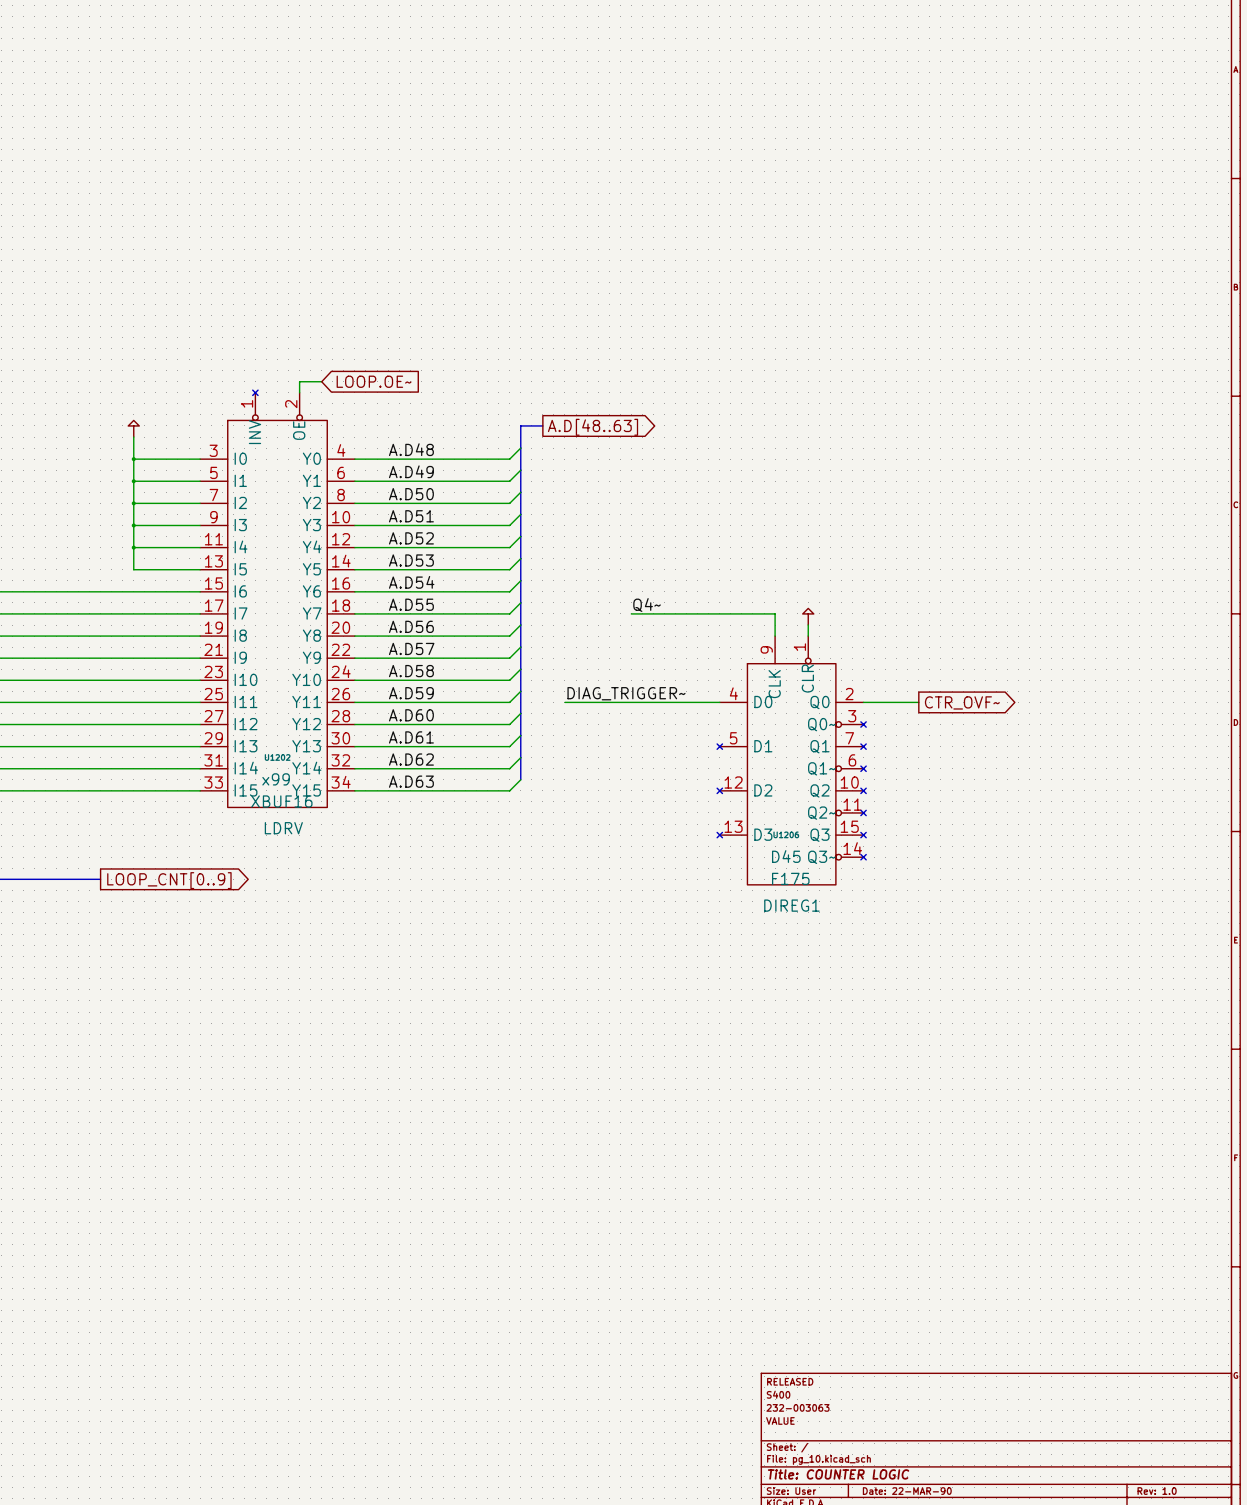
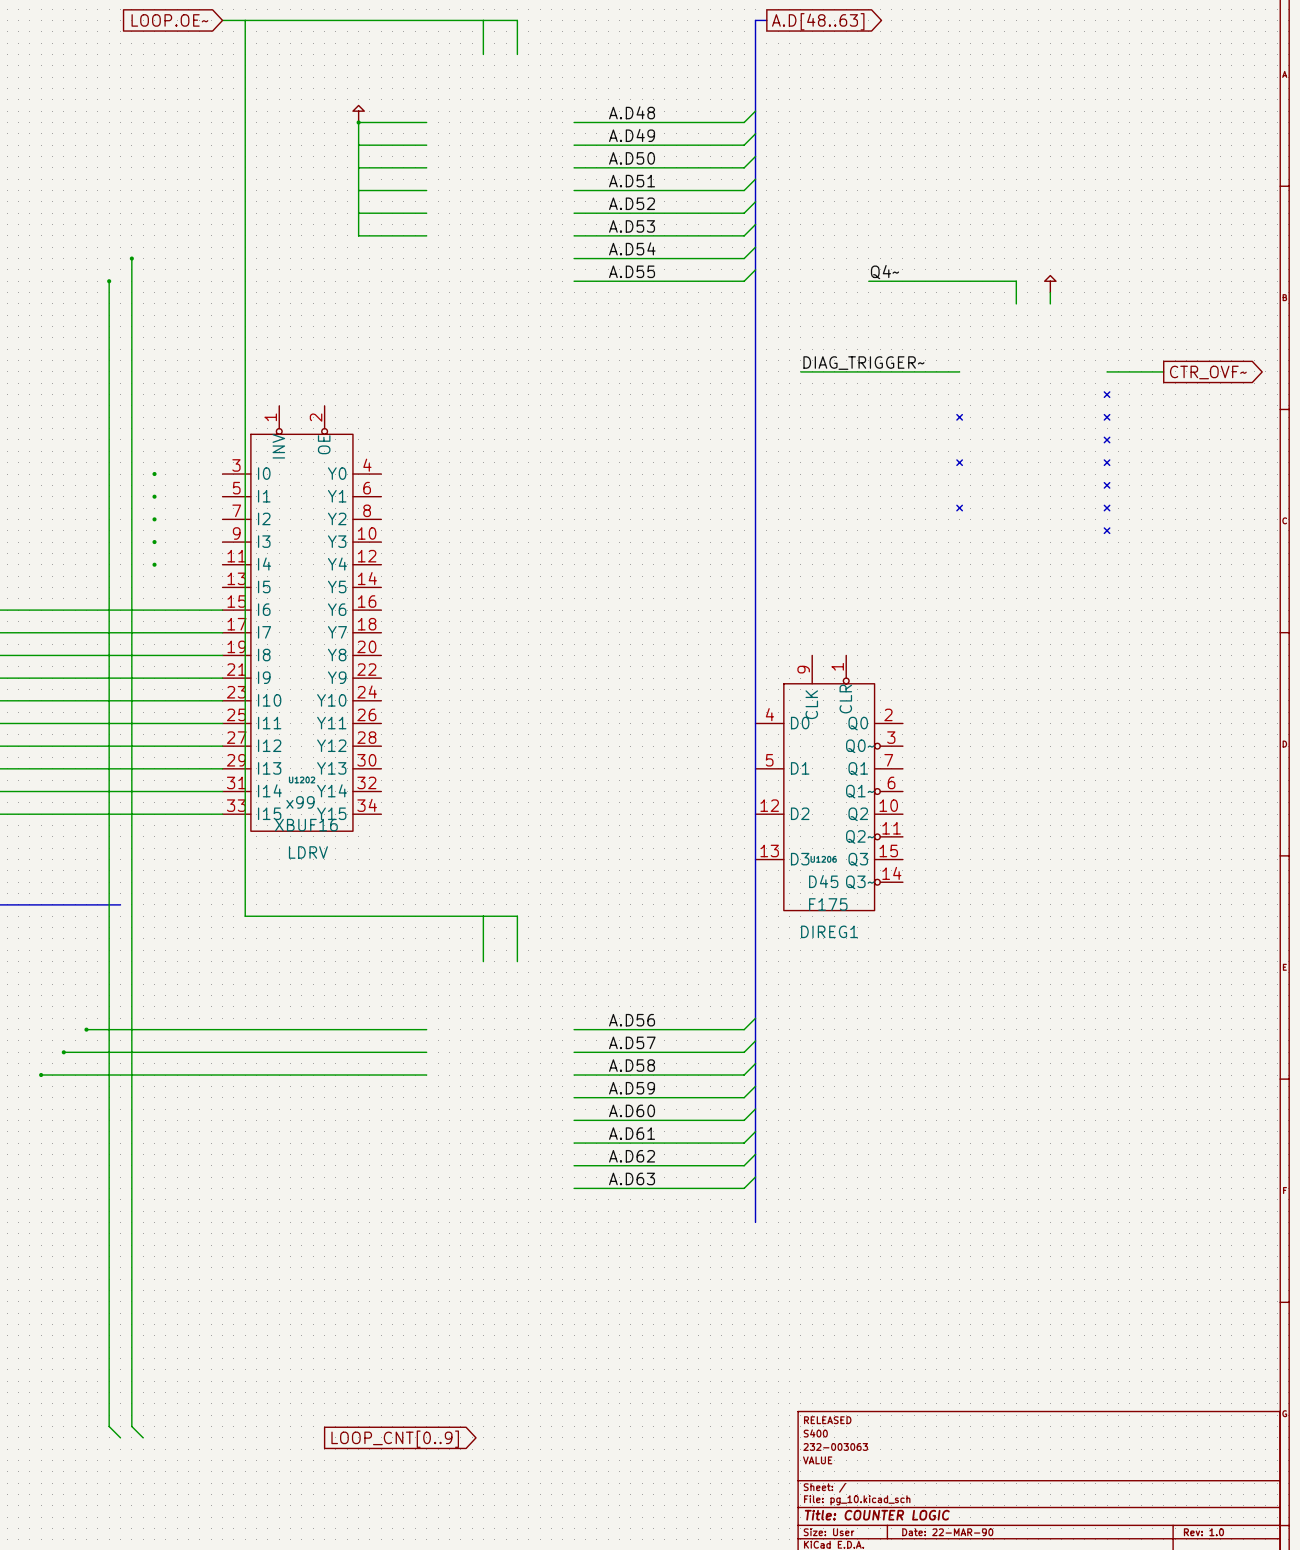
global label: none -> LOOP.OE~ (169, 20)
wire: none -> (222, 20) (517, 20) (517, 54)
wire: none -> (245, 20) (245, 916) (517, 916) (517, 961)
wire: none -> (483, 20) (483, 54)
bus: none -> (766, 20) (755, 20) (755, 1222)
global label: none -> A.D[48..63] (818, 21)
wire: none -> (755, 111) (744, 122) (574, 122)
label: none -> A.D48 (632, 112)
power symbol: none -> (358, 113)
junction: none -> (358, 122)
wire: none -> (426, 122) (358, 122) (358, 235) (426, 235)
wire: none -> (755, 133) (744, 145) (574, 145)
label: none -> A.D49 (632, 135)
wire: none -> (358, 145) (426, 145)
wire: none -> (755, 156) (744, 167) (574, 167)
label: none -> A.D50 (632, 158)
wire: none -> (358, 167) (426, 167)
wire: none -> (755, 179) (744, 190) (574, 190)
label: none -> A.D51 (632, 181)
wire: none -> (358, 190) (426, 190)
wire: none -> (755, 201) (744, 213) (574, 213)
label: none -> A.D52 (632, 203)
wire: none -> (358, 213) (426, 213)
wire: none -> (755, 224) (744, 235) (574, 235)
label: none -> A.D53 (632, 226)
wire: none -> (755, 247) (744, 258) (574, 258)
label: none -> A.D54 (632, 248)
wire: none -> (131, 258) (131, 1426) (143, 1437)
junction: none -> (131, 258)
wire: none -> (755, 269) (744, 281) (574, 281)
label: none -> A.D55 (632, 271)
label: none -> Q4~ (885, 272)
wire: none -> (109, 281) (109, 1426) (120, 1437)
junction: none -> (109, 281)
wire: none -> (868, 281) (1016, 281) (1016, 303)
power symbol: none -> (1050, 283)
wire: none -> (1050, 292) (1050, 303)
label: none -> DIAG_TRIGGER~ (863, 363)
wire: none -> (800, 371) (959, 371)
wire: none -> (1107, 371) (1163, 371)
global label: none -> CTR_OVF~ (1208, 372)
wire: (321, 381) (299, 381) (299, 392) -> none
global label: LOOP.OE~ (374, 381) -> none
no-connect mark: none -> (1107, 394)
no-connect mark: (255, 392) -> none
no-connect mark: none -> (959, 417)
no-connect mark: none -> (1107, 417)
bus: (542, 425) (520, 425) (520, 779) -> none
no-connect mark: none -> (1107, 439)
global label: A.D[48..63] (593, 427) -> none
power symbol: (133, 428) -> none
wire: (133, 437) (133, 569) (200, 569) -> none
wire: (520, 448) (509, 459) (354, 459) -> none
no-connect mark: none -> (959, 462)
no-connect mark: none -> (1107, 462)
label: A.D48 (411, 449) -> none
wire: (133, 459) (200, 459) -> none
wire: (520, 470) (509, 481) (354, 481) -> none
no-connect mark: none -> (1107, 485)
label: A.D49 (411, 471) -> none
wire: (133, 481) (200, 481) -> none
wire: (520, 492) (509, 503) (354, 503) -> none
no-connect mark: none -> (959, 508)
no-connect mark: none -> (1107, 508)
label: A.D50 (411, 494) -> none
wire: (133, 503) (200, 503) -> none
wire: (520, 514) (509, 525) (354, 525) -> none
no-connect mark: none -> (1107, 530)
label: A.D51 (411, 516) -> none
wire: (133, 525) (200, 525) -> none
wire: (520, 536) (509, 547) (354, 547) -> none
label: A.D52 (411, 538) -> none
wire: (133, 547) (200, 547) -> none
wire: (520, 558) (509, 569) (354, 569) -> none
label: A.D53 (411, 560) -> none
wire: (520, 580) (509, 591) (354, 591) -> none
label: A.D54 (411, 582) -> none
wire: (520, 602) (509, 613) (354, 613) -> none
label: A.D55 (411, 604) -> none
label: Q4~ (647, 605) -> none
wire: (631, 613) (775, 613) (775, 636) -> none
power symbol: (808, 616) -> none
wire: (520, 625) (509, 636) (354, 636) -> none
wire: (808, 625) (808, 636) -> none
label: A.D56 (411, 626) -> none
wire: (520, 647) (509, 658) (354, 658) -> none
label: A.D57 (411, 648) -> none
wire: (520, 669) (509, 680) (354, 680) -> none
label: A.D58 (411, 671) -> none
wire: (520, 691) (509, 702) (354, 702) -> none
label: A.D59 (411, 693) -> none
label: DIAG_TRIGGER~ (626, 693) -> none
wire: (564, 702) (719, 702) -> none
wire: (863, 702) (918, 702) -> none
global label: CTR_OVF~ (962, 702) -> none
wire: (520, 713) (509, 724) (354, 724) -> none
label: A.D60 (411, 715) -> none
no-connect mark: (863, 724) -> none
wire: (520, 735) (509, 746) (354, 746) -> none
label: A.D61 (411, 737) -> none
no-connect mark: (719, 746) -> none
no-connect mark: (863, 746) -> none
wire: (520, 757) (509, 768) (354, 768) -> none
label: A.D62 (411, 759) -> none
no-connect mark: (863, 768) -> none
wire: (520, 779) (509, 790) (354, 790) -> none
label: A.D63 (411, 781) -> none
no-connect mark: (719, 790) -> none
no-connect mark: (863, 790) -> none
no-connect mark: (863, 812) -> none
no-connect mark: (719, 835) -> none
no-connect mark: (863, 835) -> none
no-connect mark: (863, 857) -> none
global label: LOOP_CNT[0..9] (169, 880) -> none
wire: none -> (483, 916) (483, 961)
wire: none -> (755, 1018) (744, 1029) (574, 1029)
label: none -> A.D56 (632, 1020)
wire: none -> (86, 1029) (426, 1029)
junction: none -> (86, 1029)
wire: none -> (755, 1040) (744, 1052) (574, 1052)
label: none -> A.D57 (632, 1042)
wire: none -> (63, 1052) (426, 1052)
junction: none -> (63, 1052)
wire: none -> (755, 1063) (744, 1075) (574, 1075)
label: none -> A.D58 (632, 1065)
wire: none -> (41, 1075) (426, 1075)
junction: none -> (41, 1075)
wire: none -> (755, 1086) (744, 1097) (574, 1097)
label: none -> A.D59 (632, 1088)
wire: none -> (755, 1109) (744, 1120) (574, 1120)
label: none -> A.D60 (632, 1110)
wire: none -> (755, 1131) (744, 1143) (574, 1143)
label: none -> A.D61 (632, 1133)
wire: none -> (755, 1154) (744, 1165) (574, 1165)
label: none -> A.D62 (632, 1156)
wire: none -> (755, 1177) (744, 1188) (574, 1188)
label: none -> A.D63 (632, 1178)
global label: none -> LOOP_CNT[0..9] (395, 1439)

